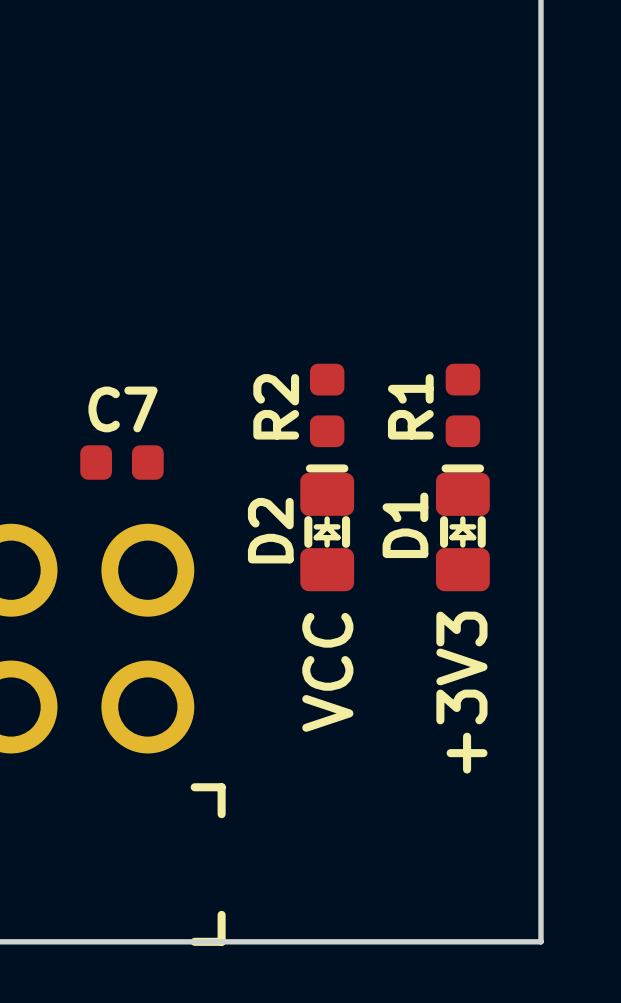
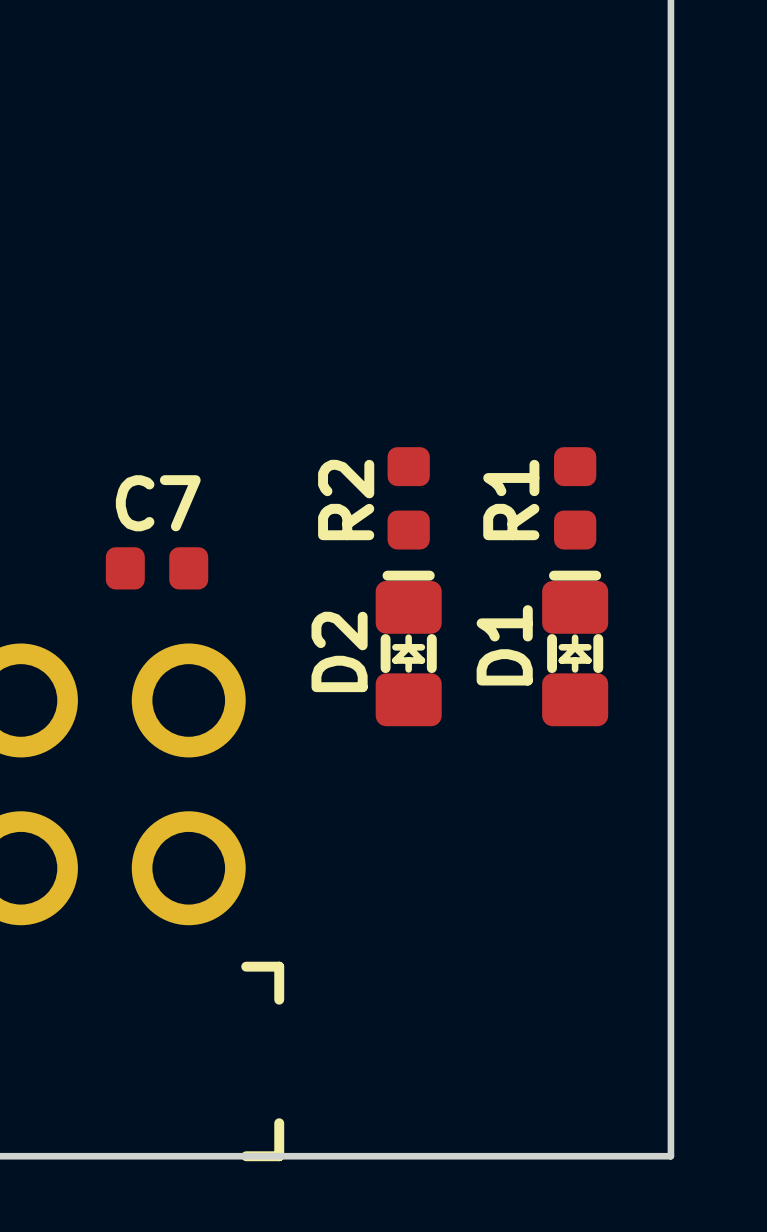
text: VCC (327, 672) -> none
text: +3V3 (461, 692) -> none

